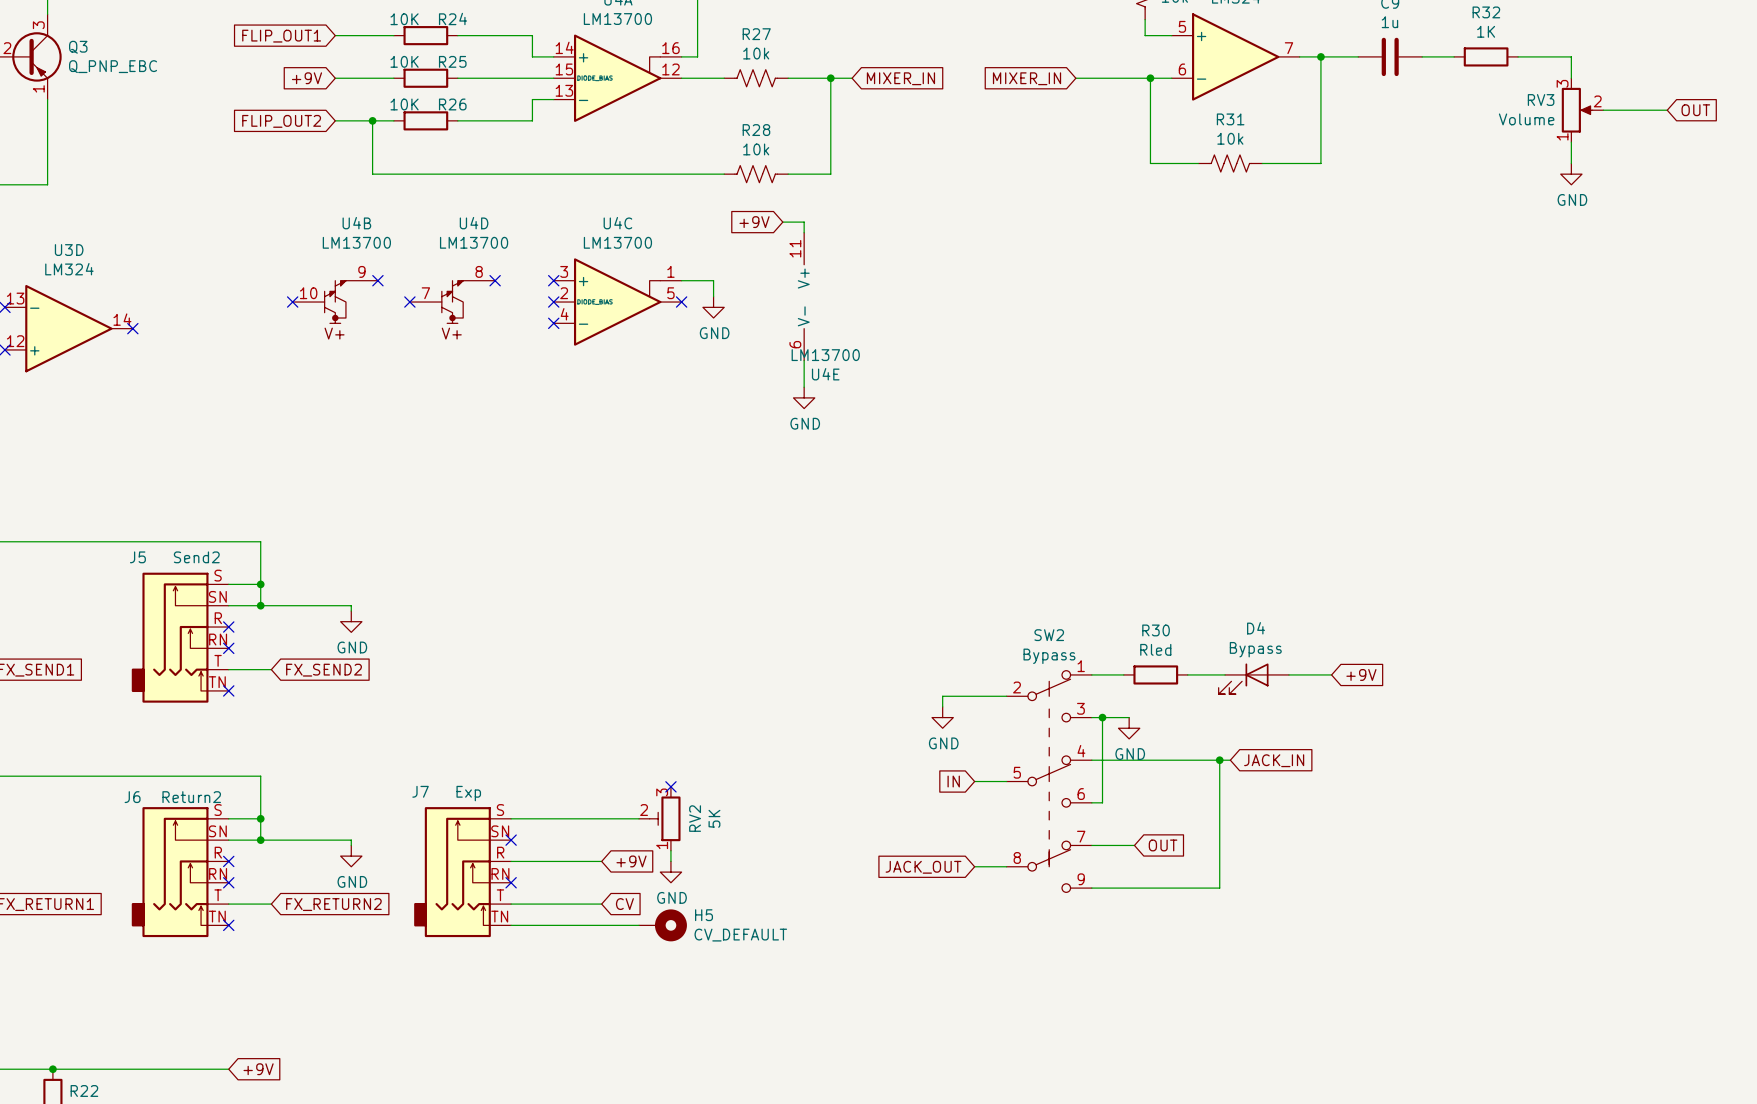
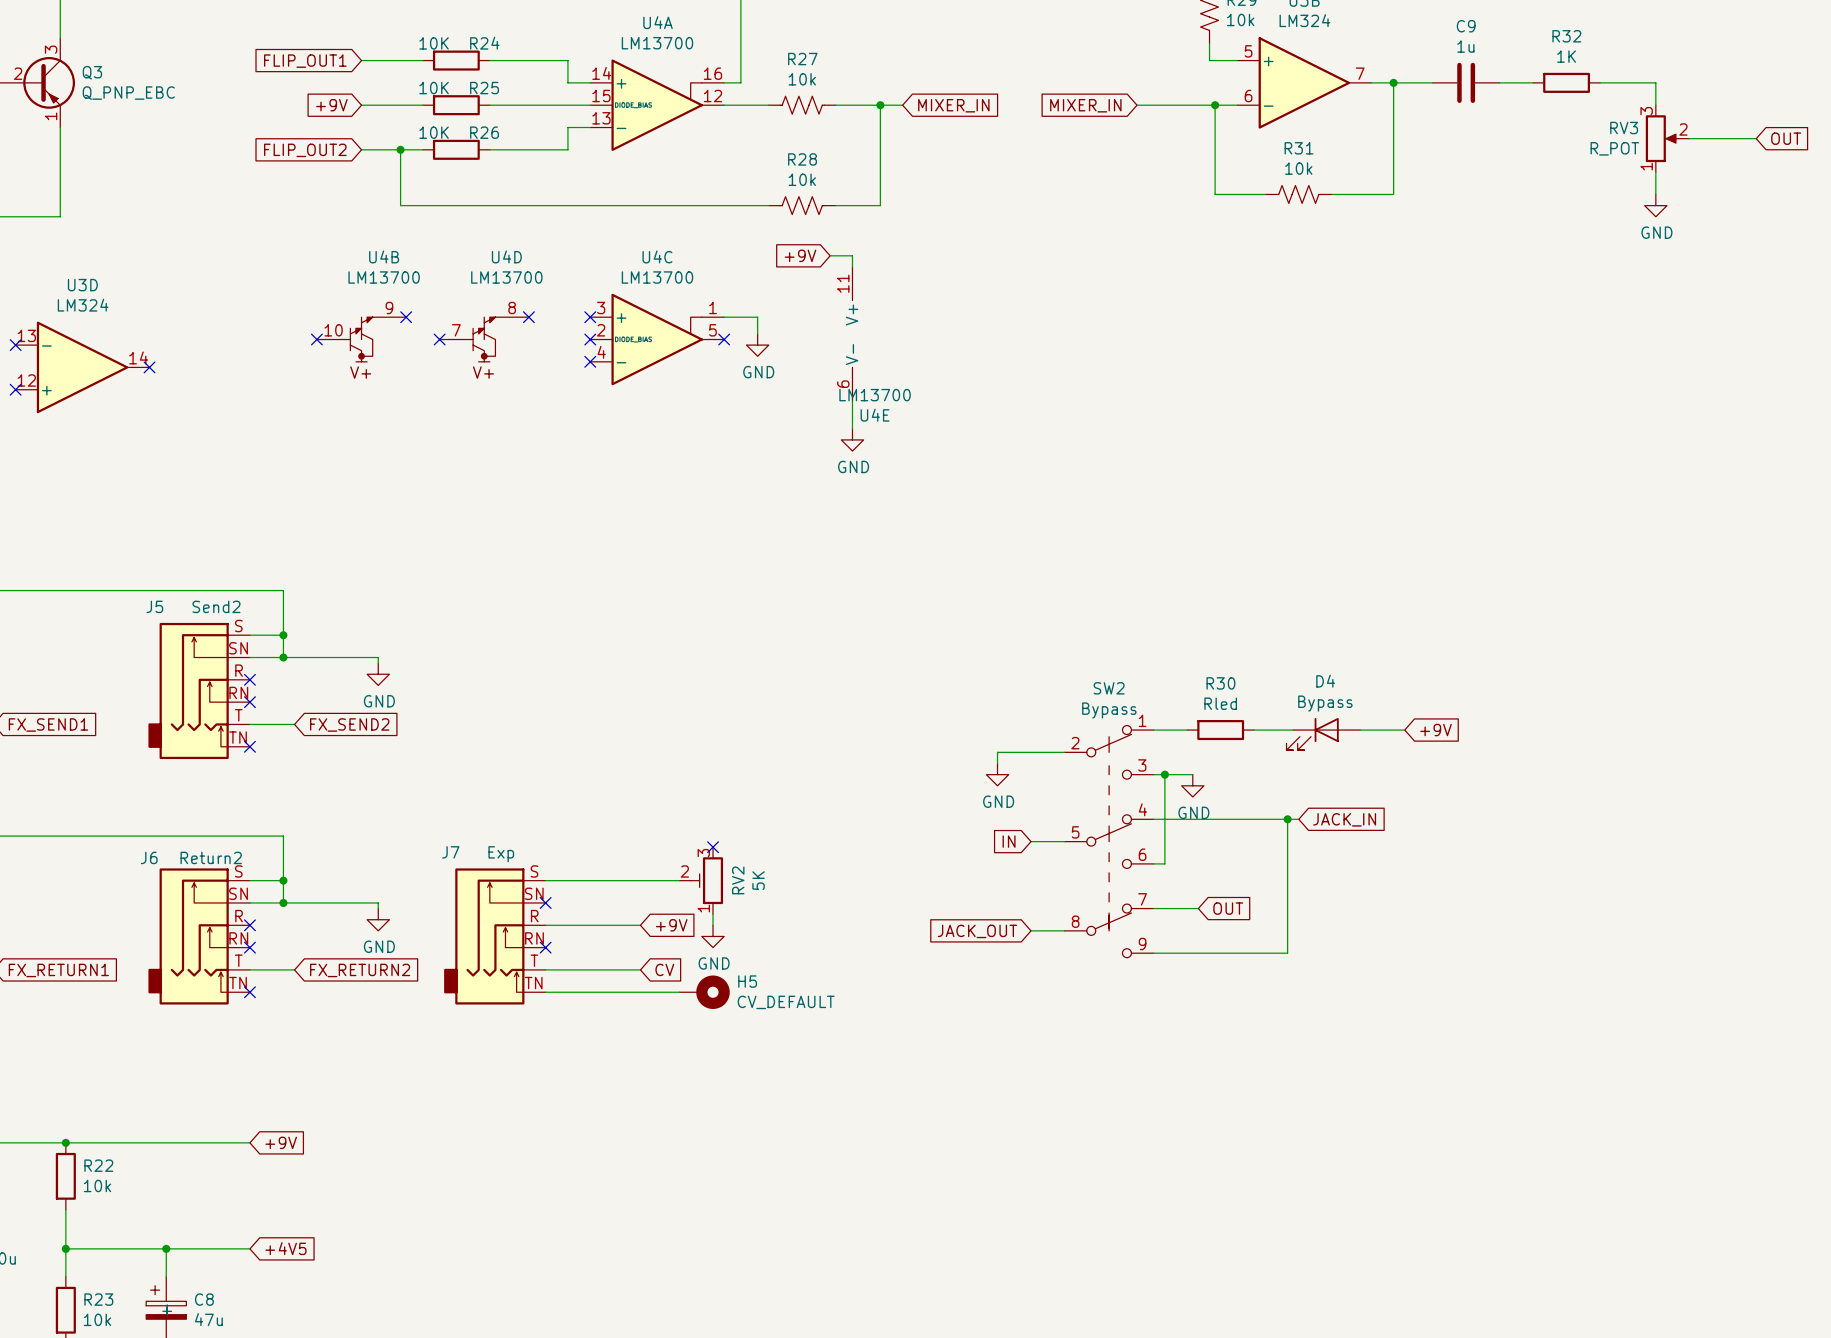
RV3 value: Volume (1526, 119) -> R_POT (1614, 148)

